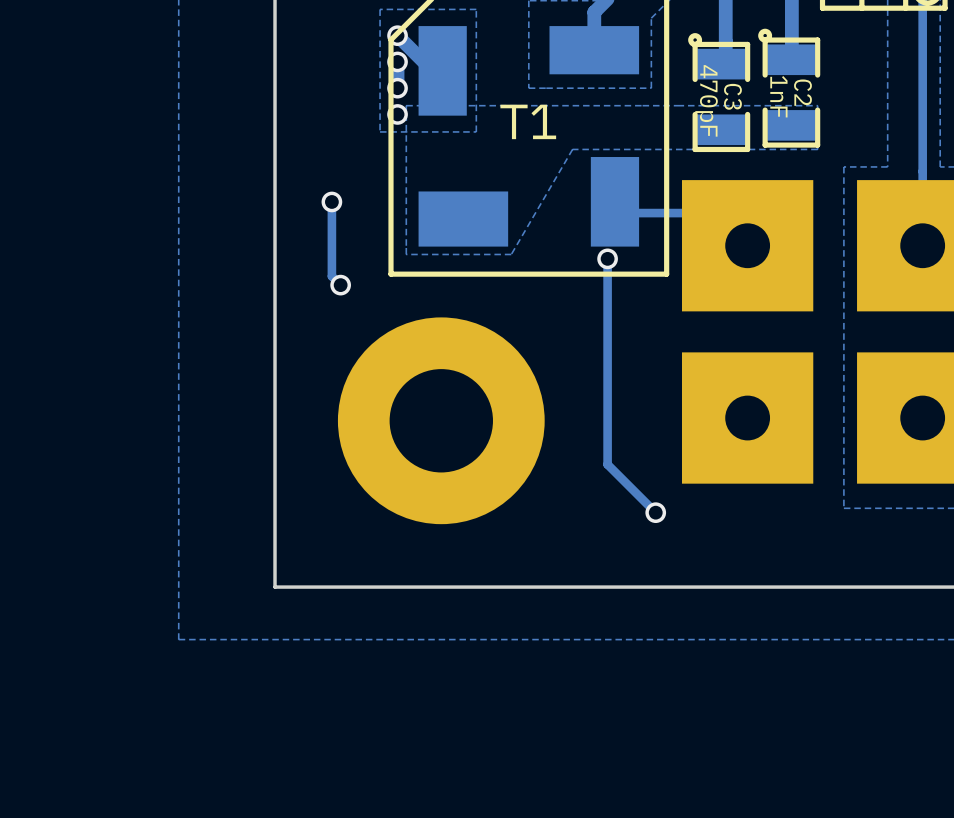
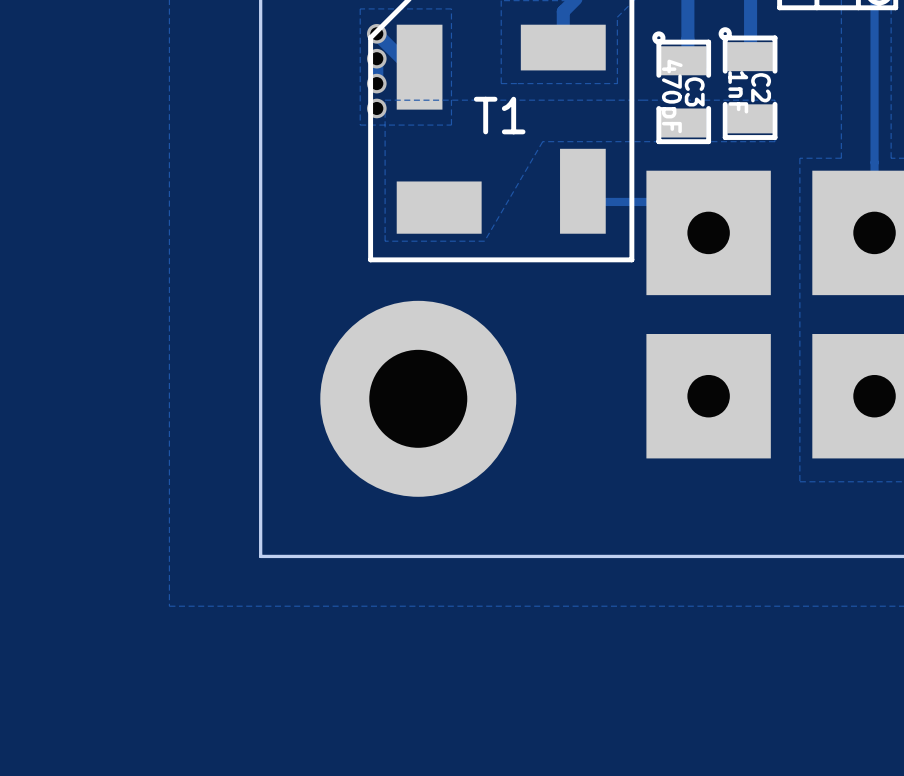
track: (331, 201) (331, 276) (340, 285) -> none
via: (331, 201) -> none
track: (607, 258) (607, 464) (655, 512) -> none
via: (607, 258) -> none
via: (340, 285) -> none
via: (655, 512) -> none

